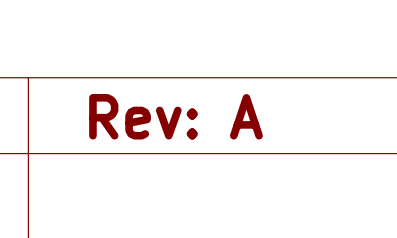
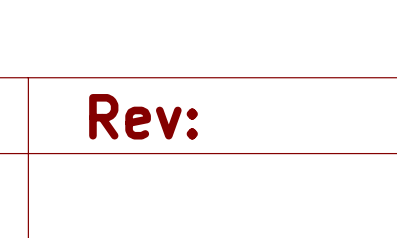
title block: Rev: A (176, 116) -> Rev: (143, 116)

